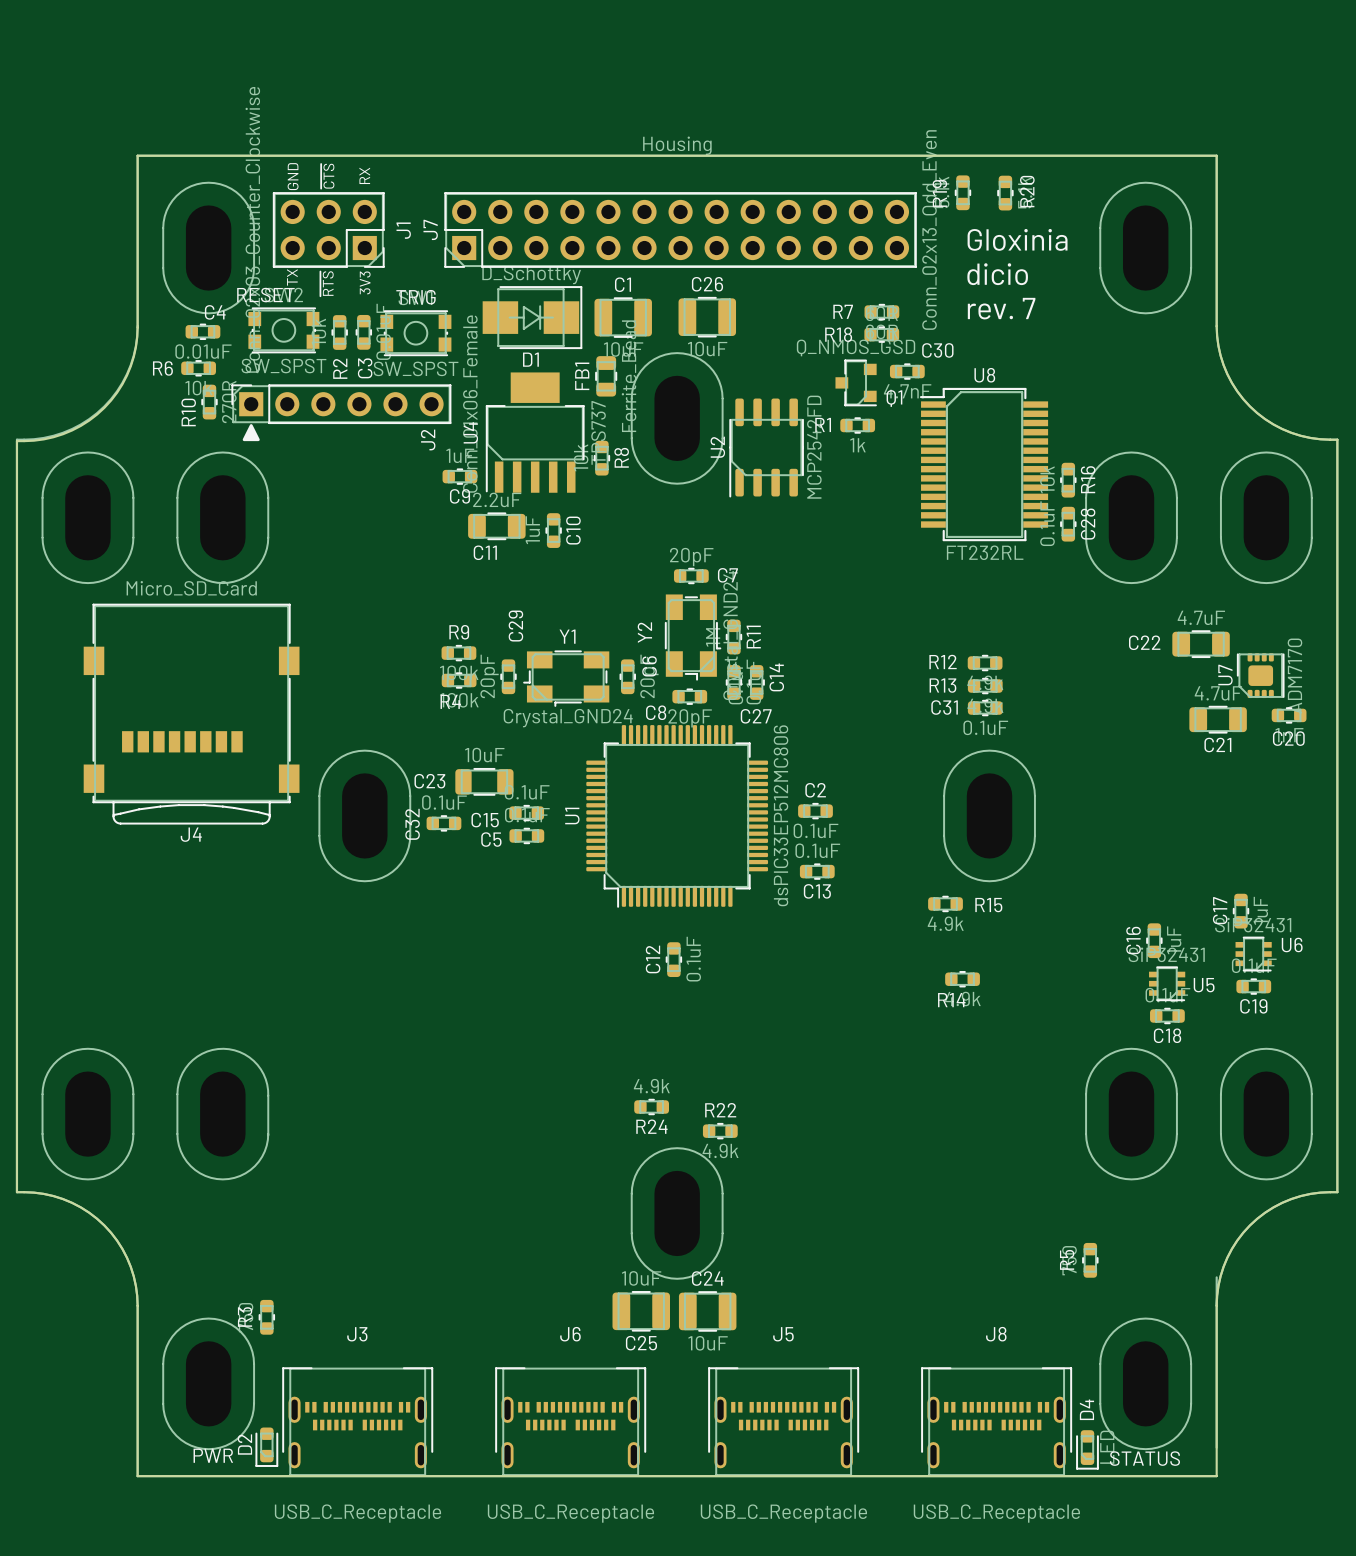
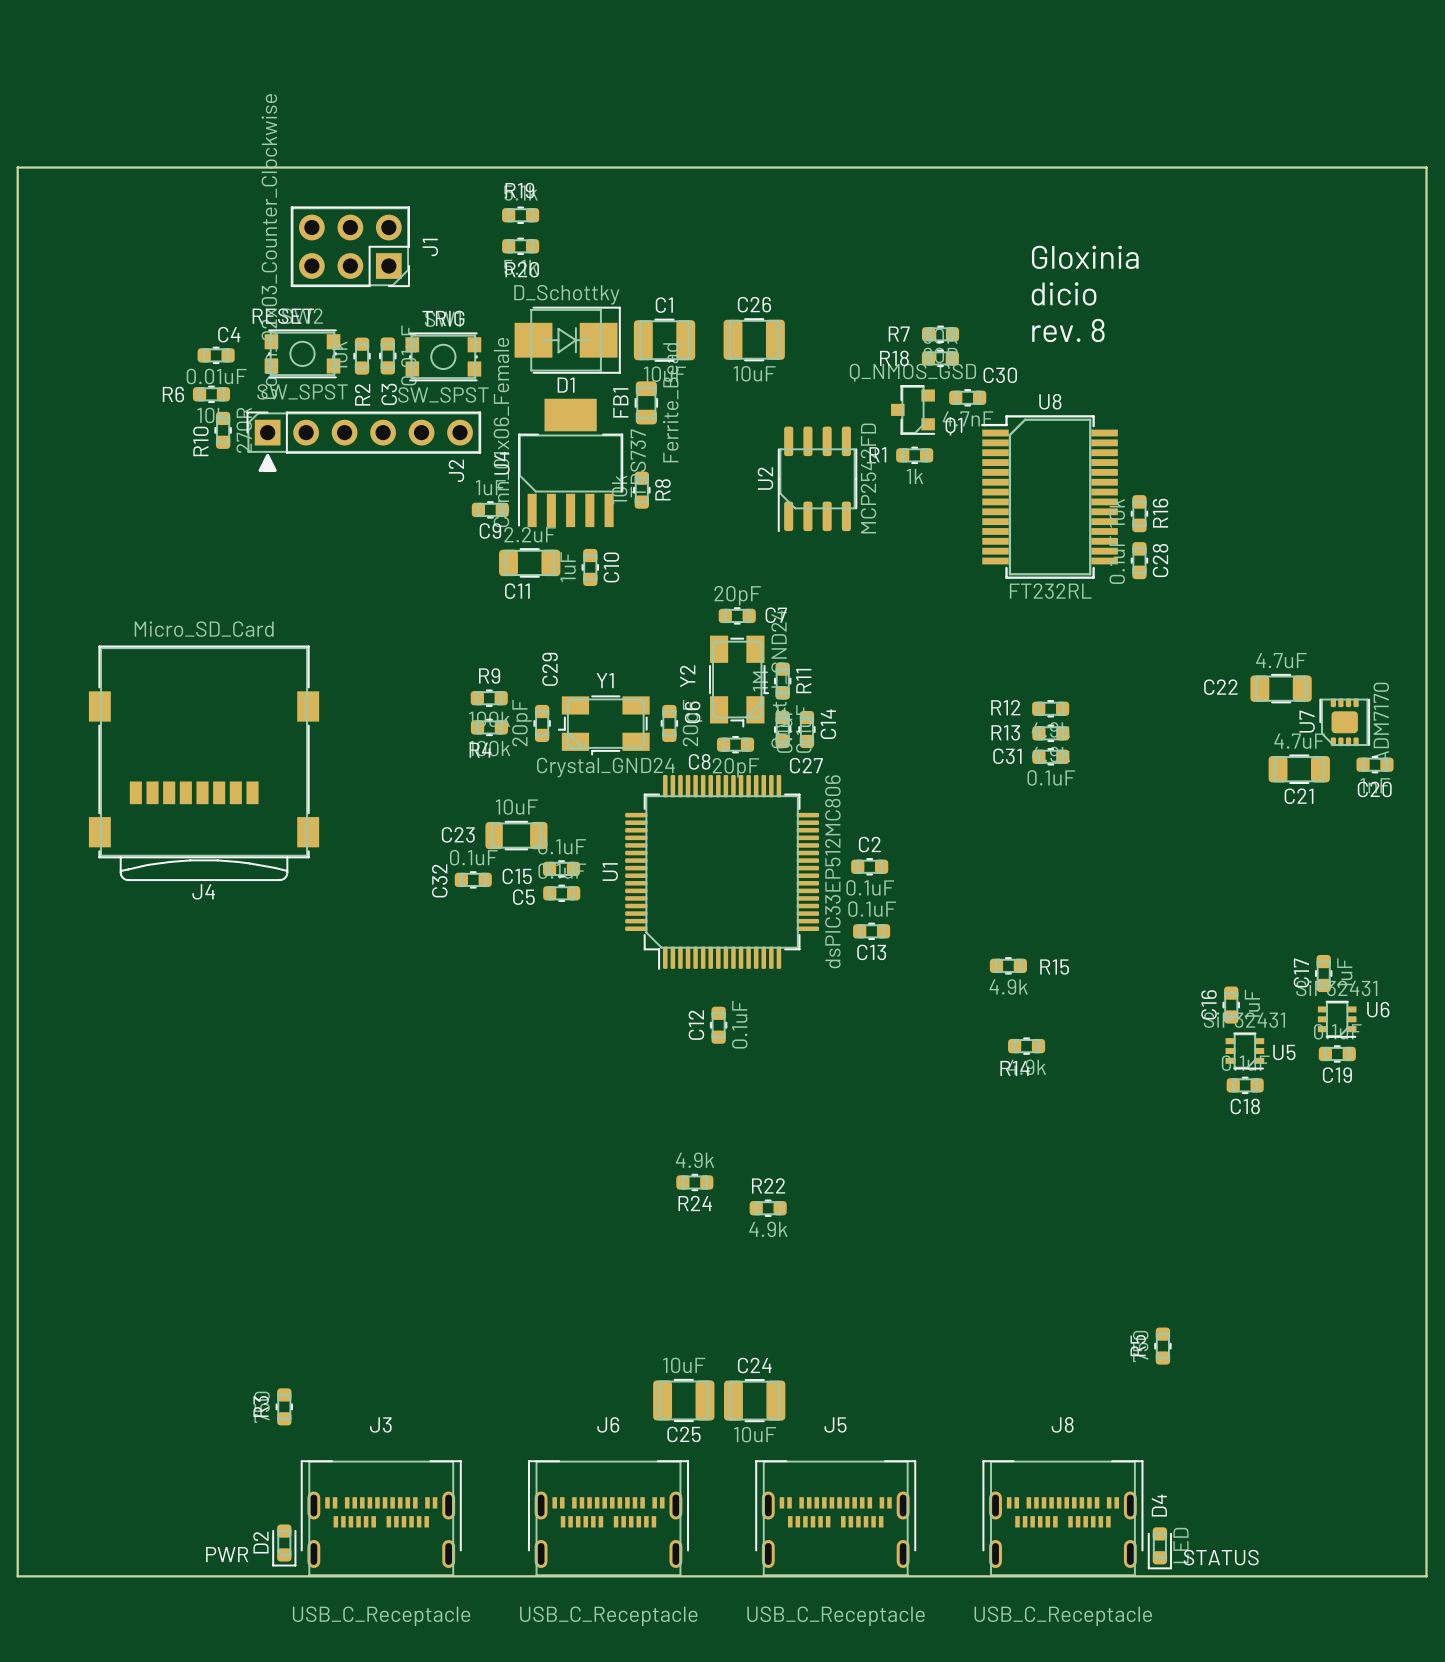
board edge: (137, 155) (137, 337) (133, 356) (127, 375) (117, 392) (104, 407) (80, 425) (53, 437) (16, 441) -> (146, 167) (17, 167) (17, 472)
board edge: (1216, 155) (1217, 336) (1220, 355) (1227, 374) (1243, 399) (1257, 413) (1273, 424) (1300, 435) (1337, 439) -> (1297, 167) (1426, 167) (1426, 470)
text: RX (364, 175) -> none
text: GND (293, 176) -> none
text: ~{CTS} (327, 176) -> none
R19 rotation: 0° (962, 192) -> 90° clockwise (520, 215)
R19 position: (962, 192) -> (520, 215)
R20 rotation: 0° (1005, 193) -> 90° clockwise (520, 246)
R20 position: (1005, 193) -> (520, 246)
J7: Conn_02x13_Odd_Even (680, 229) -> none
text: TX (292, 277) -> none
text: 3V3 (365, 282) -> none
text: ~{RTS} (327, 283) -> none
text: rev. 7 (1001, 308) -> rev. 8 (1068, 330)
part: Housing (677, 815) -> none
board edge: (16, 1192) (53, 1196) (80, 1207) (104, 1225) (117, 1240) (127, 1257) (133, 1276) (137, 1295) (137, 1476) -> (17, 1273) (17, 1576) (146, 1576)
board edge: (1337, 1192) (1300, 1196) (1273, 1207) (1257, 1218) (1243, 1232) (1227, 1257) (1220, 1276) (1217, 1295) (1216, 1476) -> (1426, 1273) (1426, 1576) (1297, 1576)

